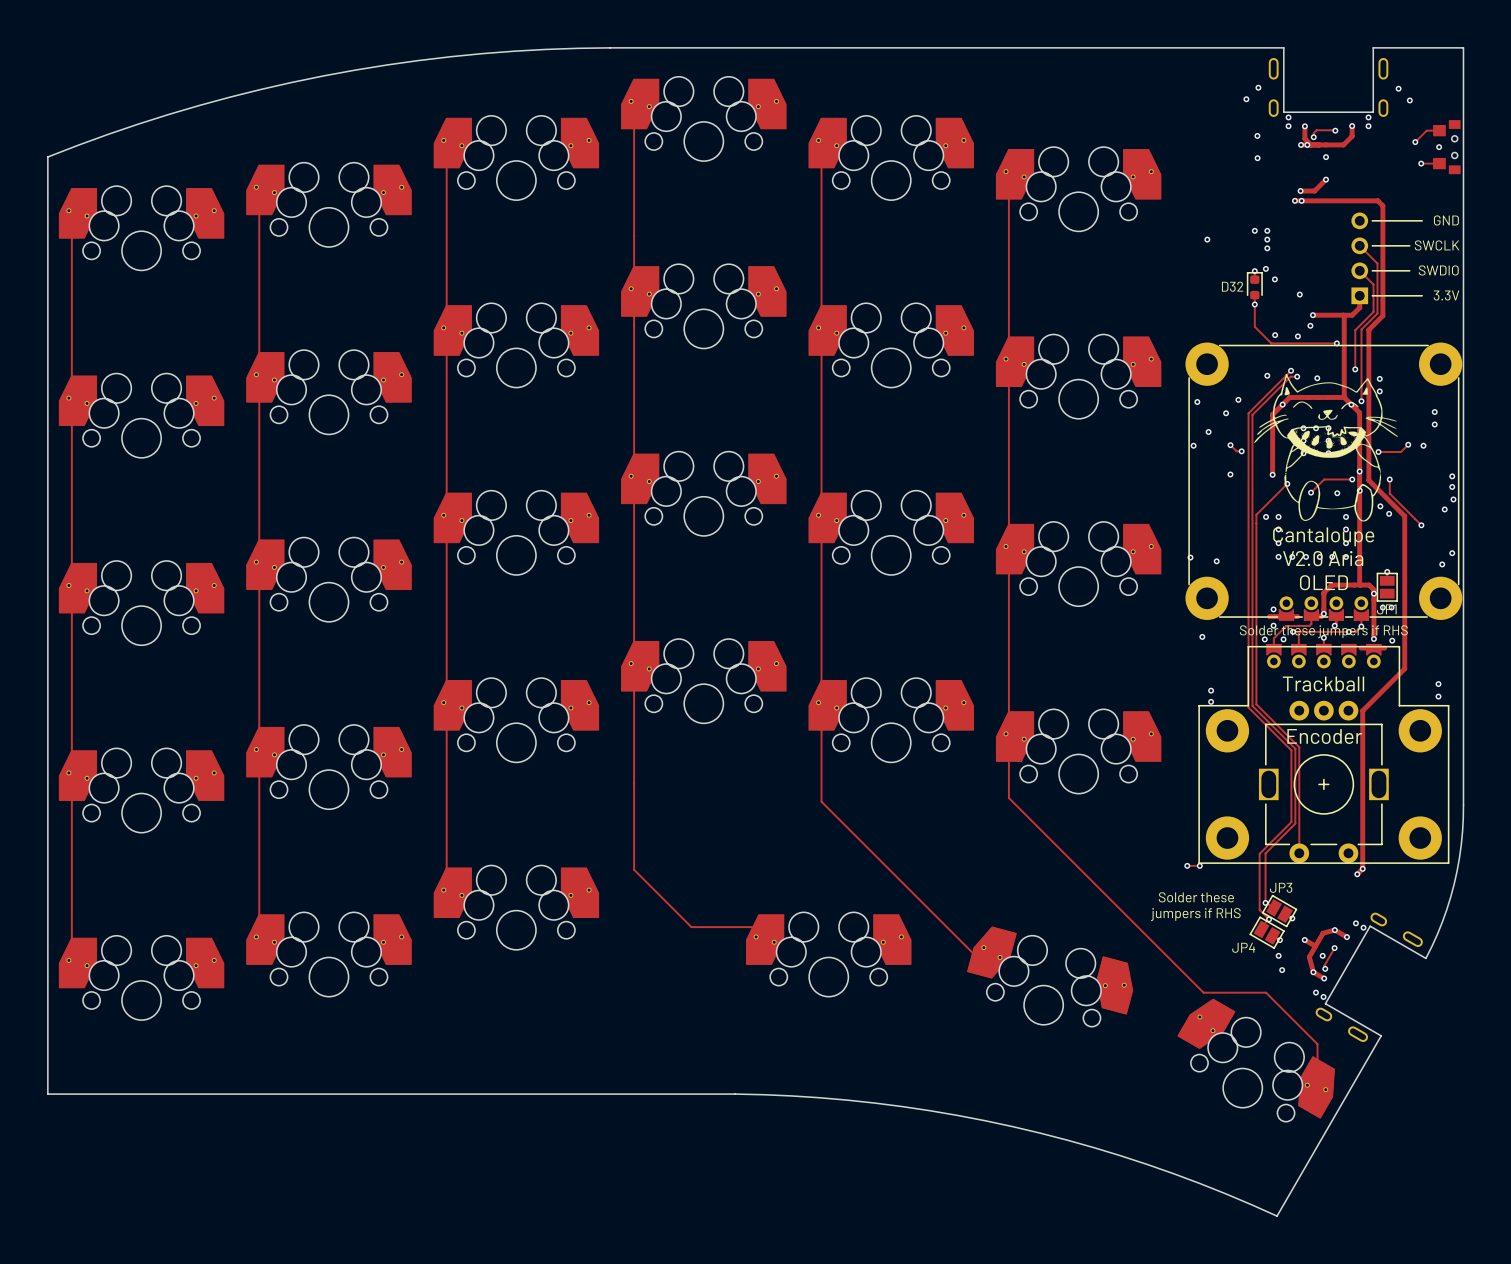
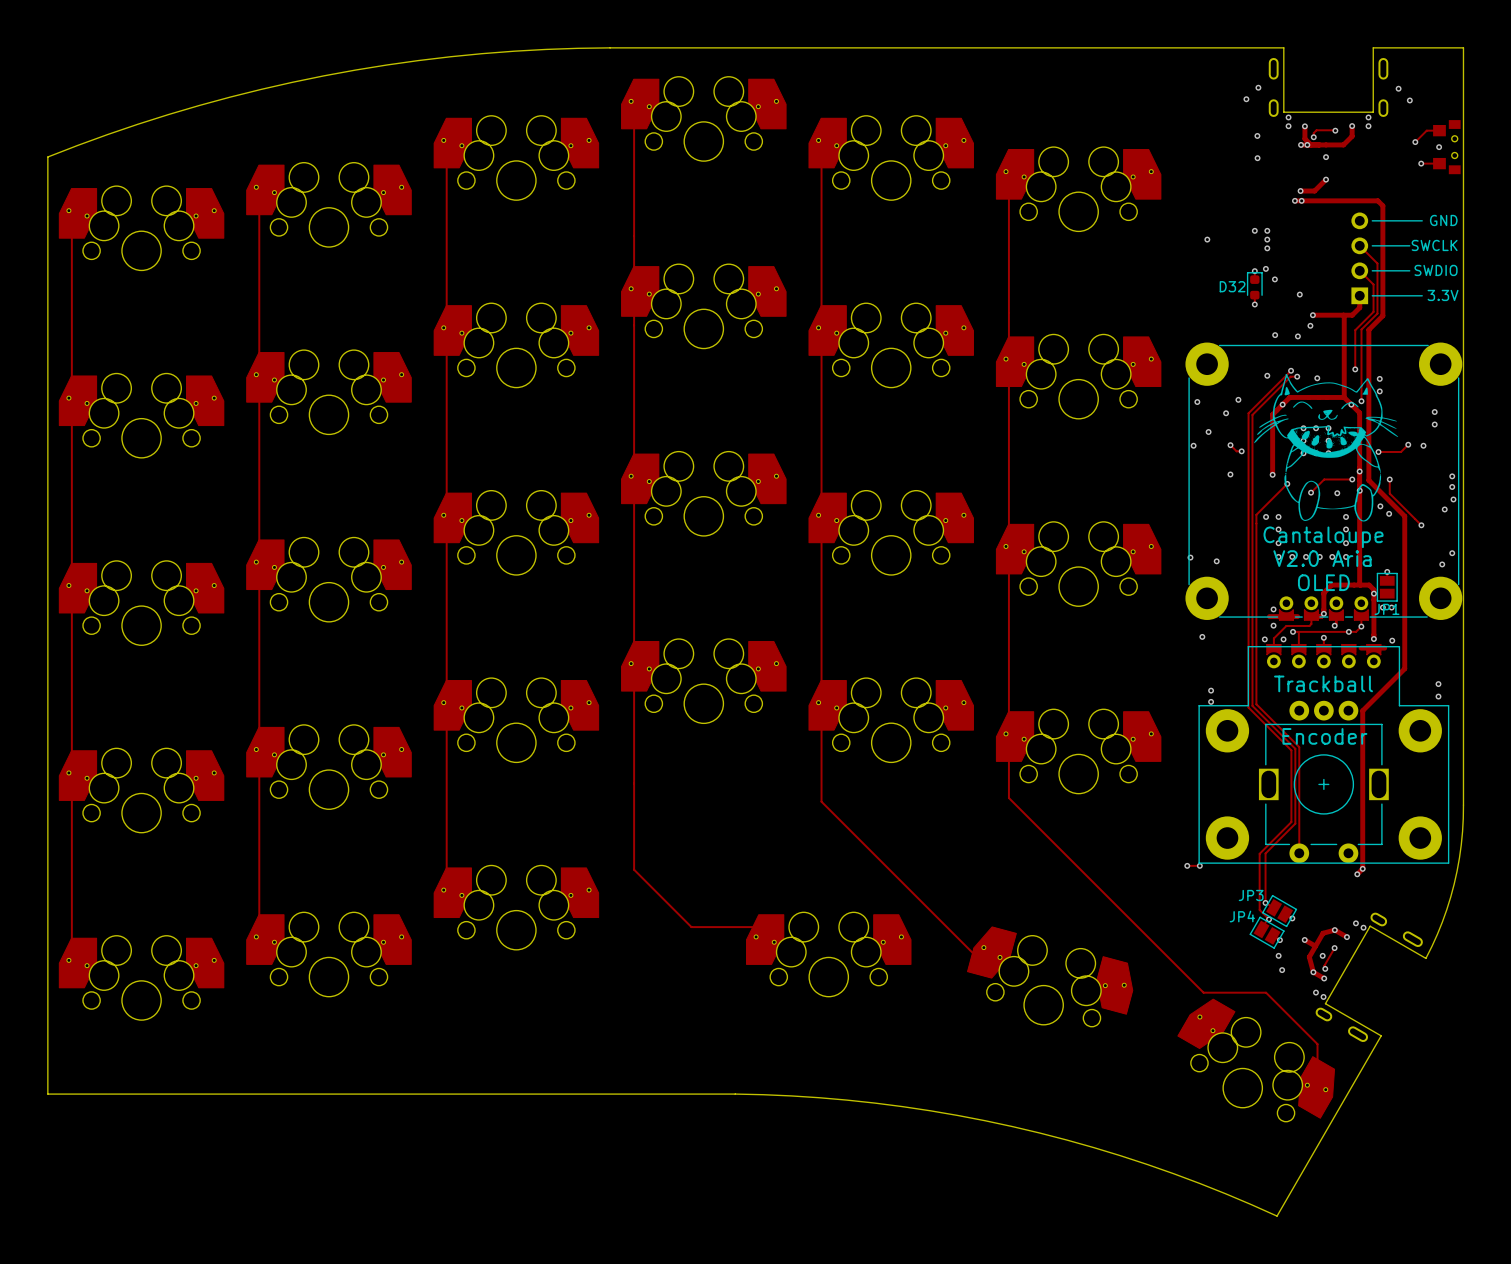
track: (1254, 304) (1254, 326) (1271, 343) (1336, 343) -> none
via: (1336, 343) -> none
text: Solder these jumpers if RHS (1323, 631) -> none
JP3 name position: JP3 (1281, 887) -> JP3 (1251, 895)
text: Solder these (1196, 897) -> none
text: jumpers if RHS (1195, 914) -> none
JP4 name position: JP4 (1243, 947) -> JP4 (1242, 916)

